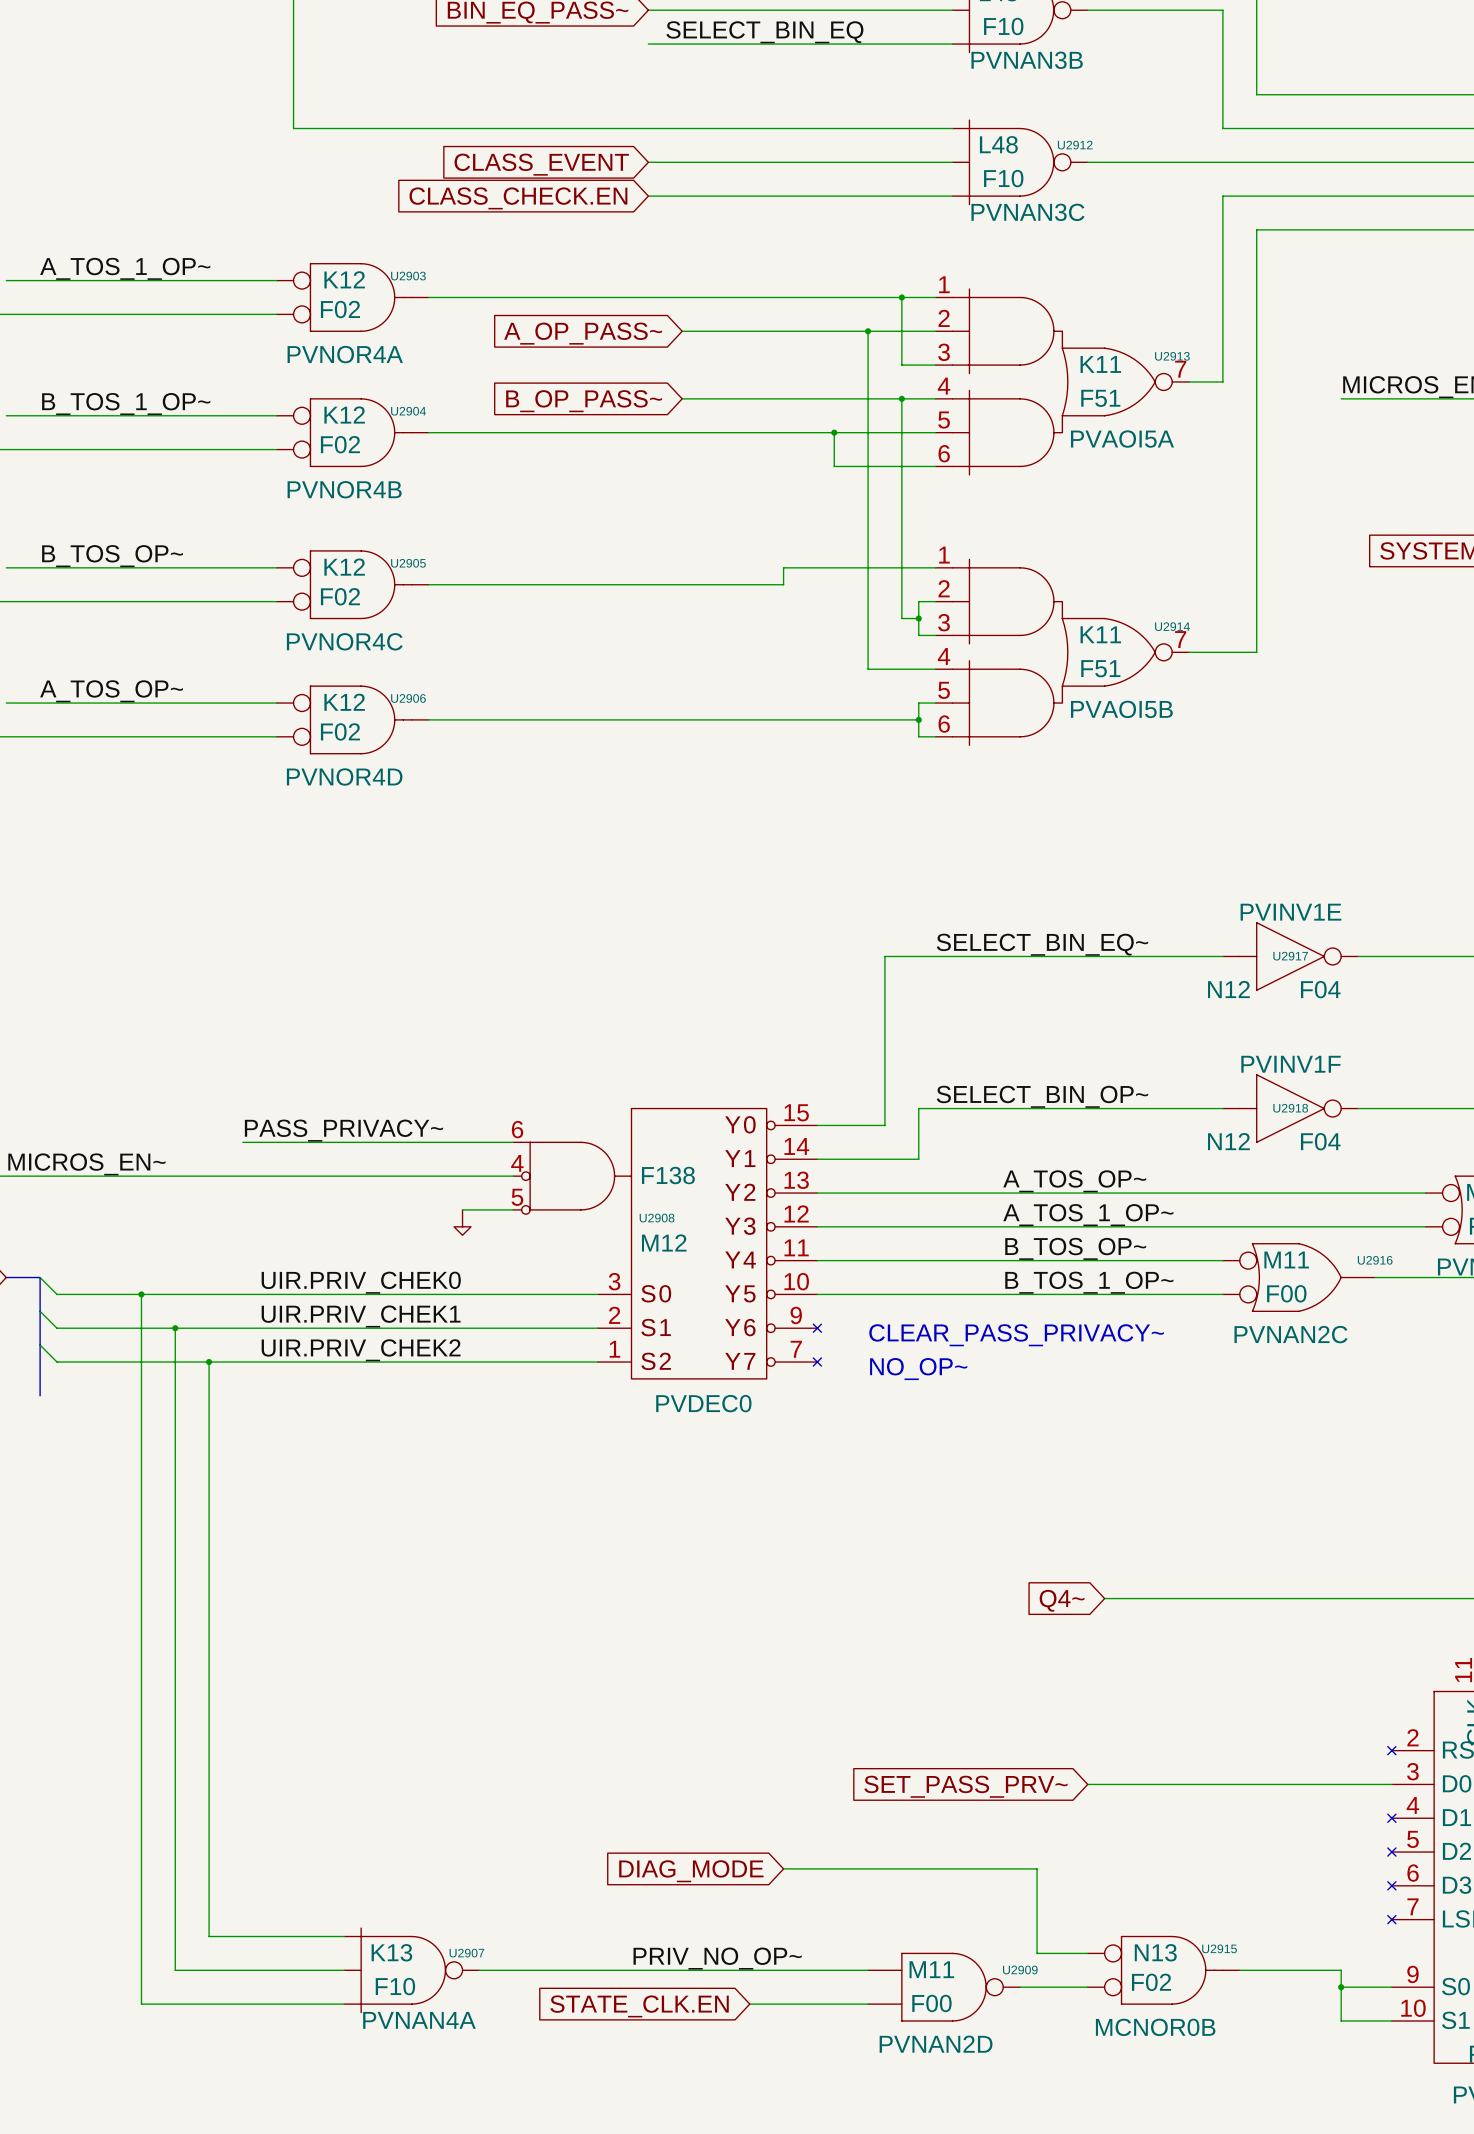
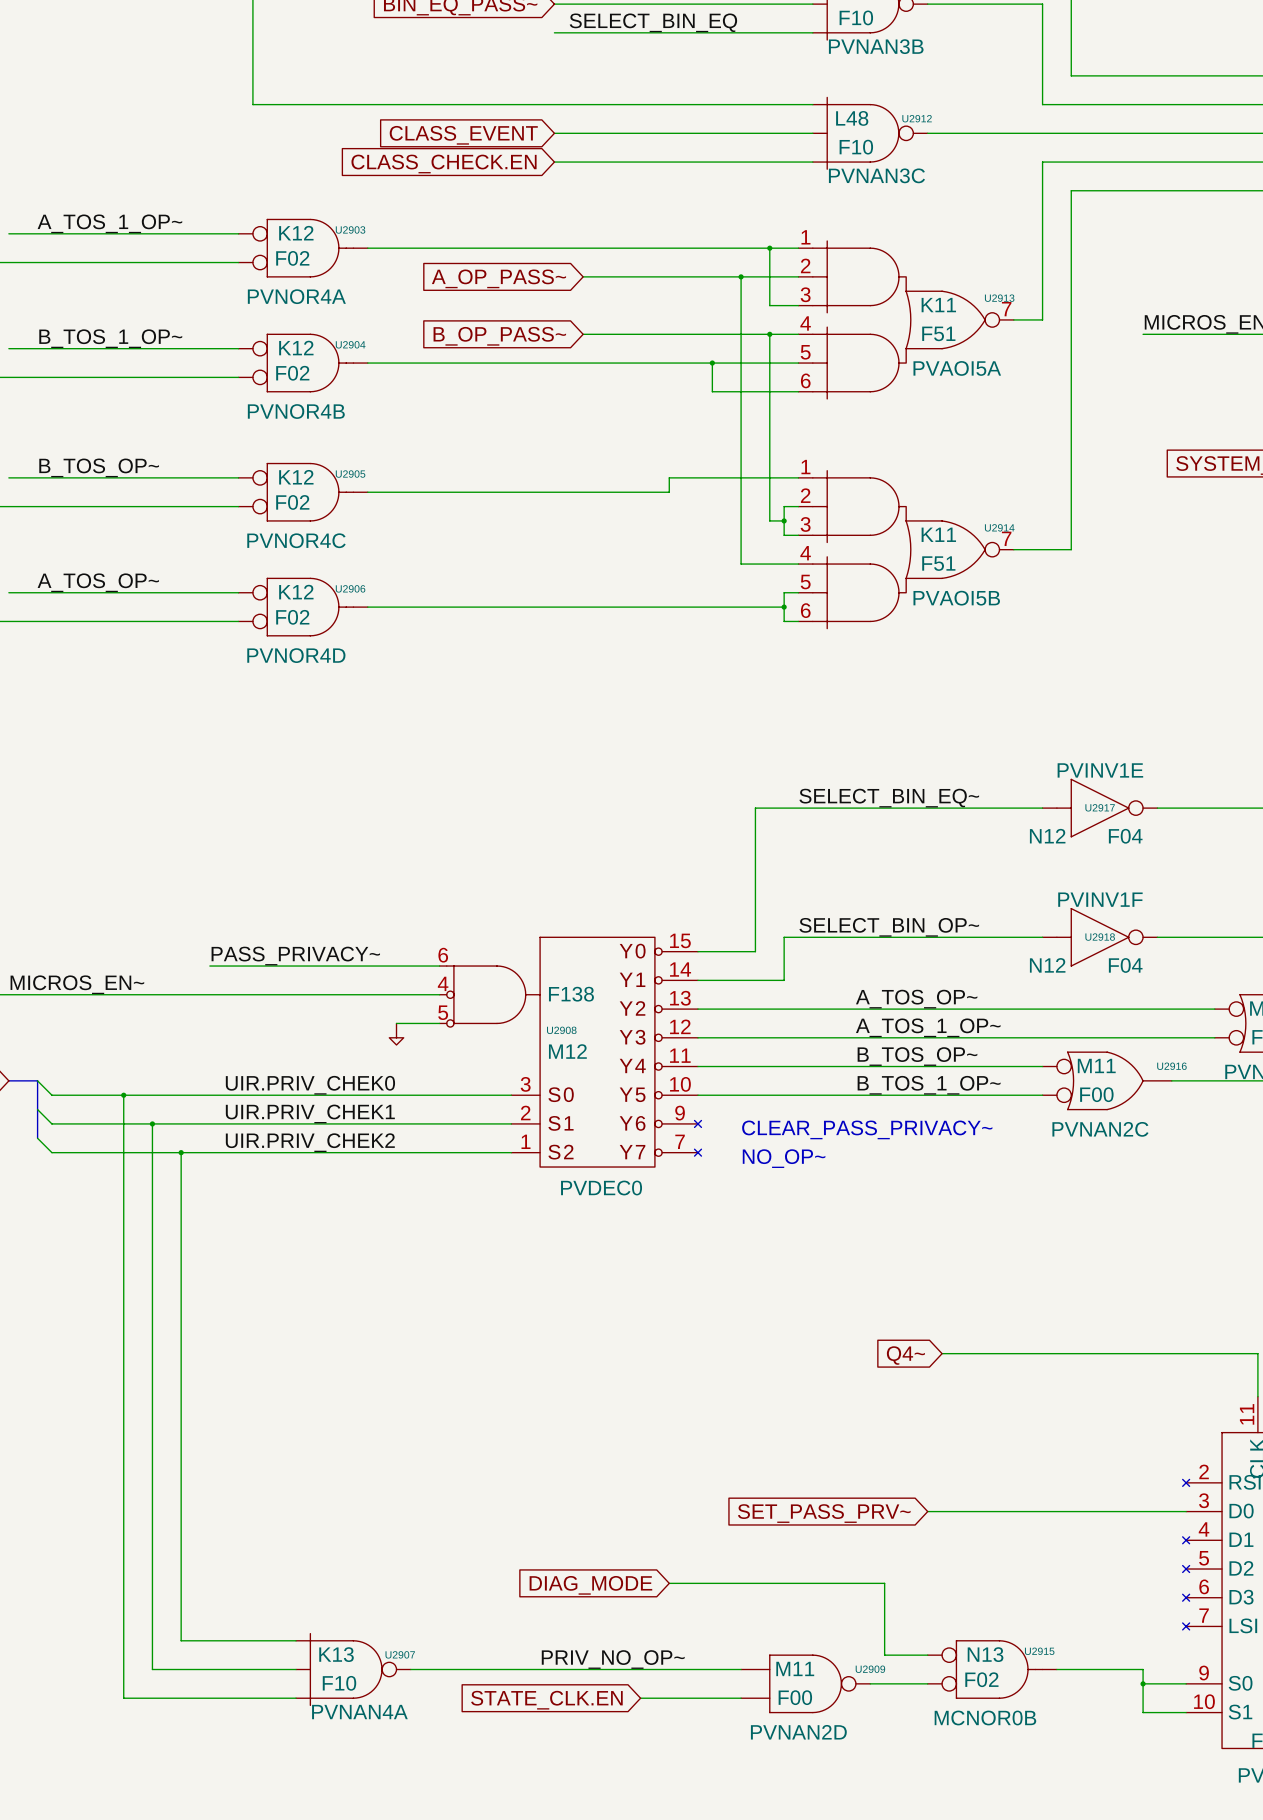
bus: (40, 1345) (40, 1395) -> none

